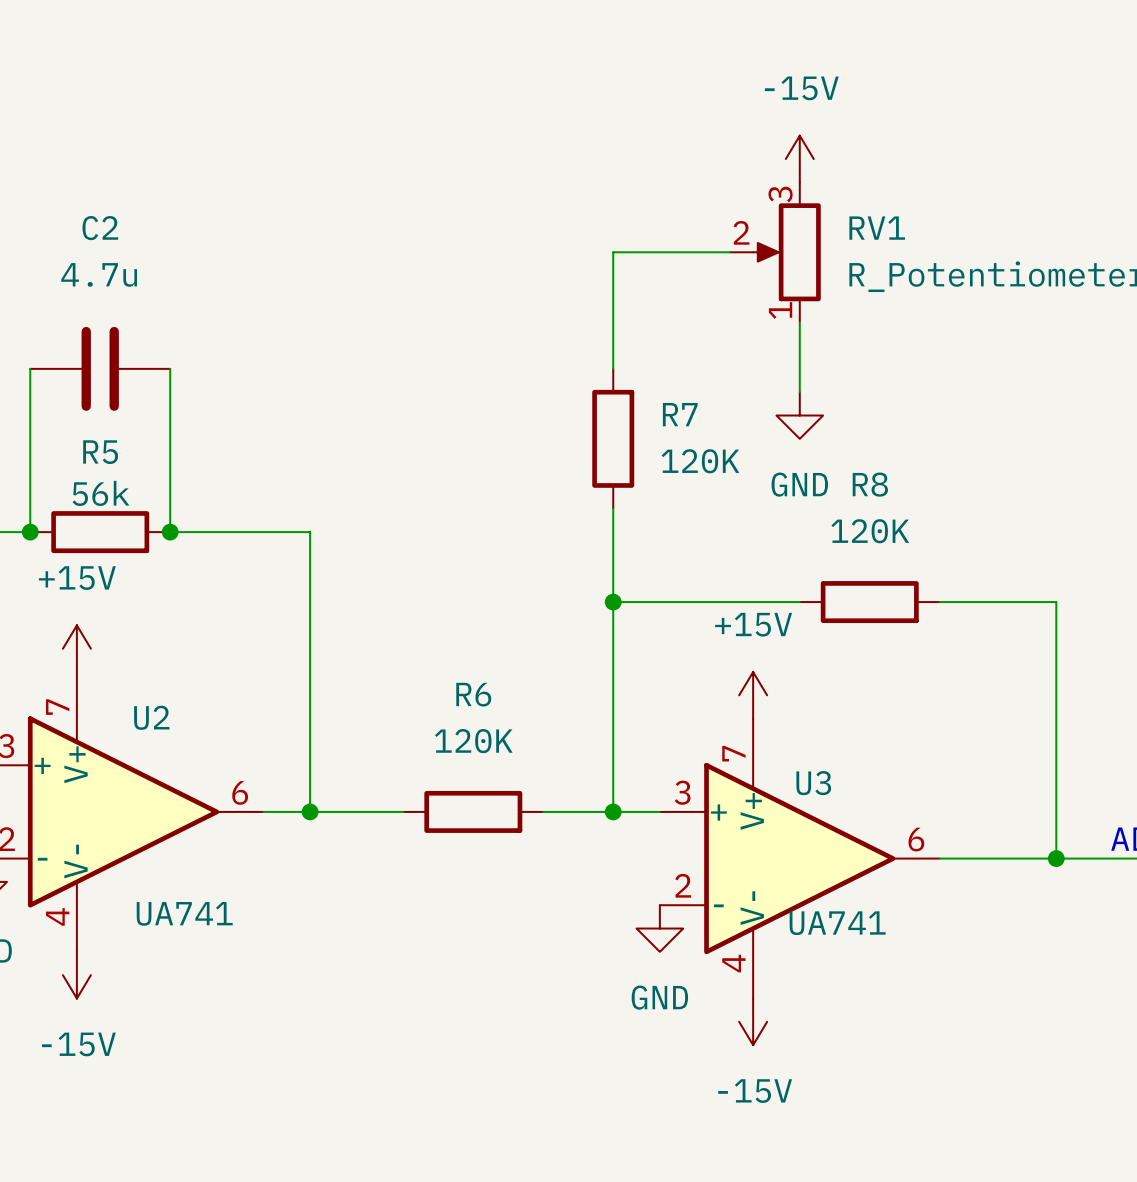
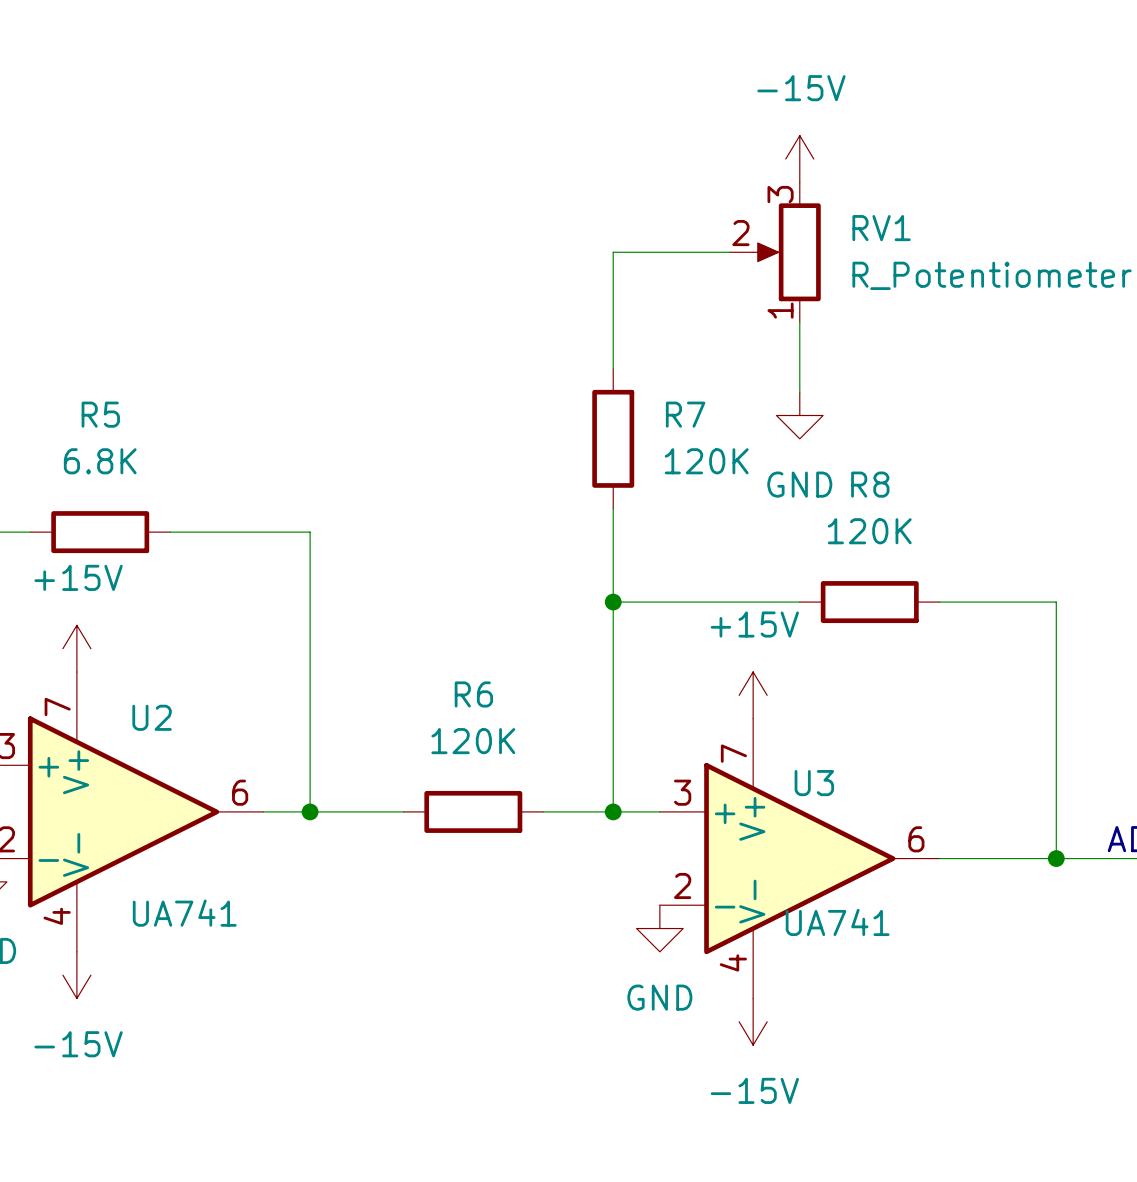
wire: (30, 368) (30, 532) -> none
C2: 4.7u (100, 368) -> none
wire: (170, 368) (170, 532) -> none
R5 name position: R5 (100, 452) -> R5 (100, 414)
R5 value: 56k (101, 493) -> 6.8K (100, 461)
junction: (30, 532) -> none
junction: (170, 532) -> none

